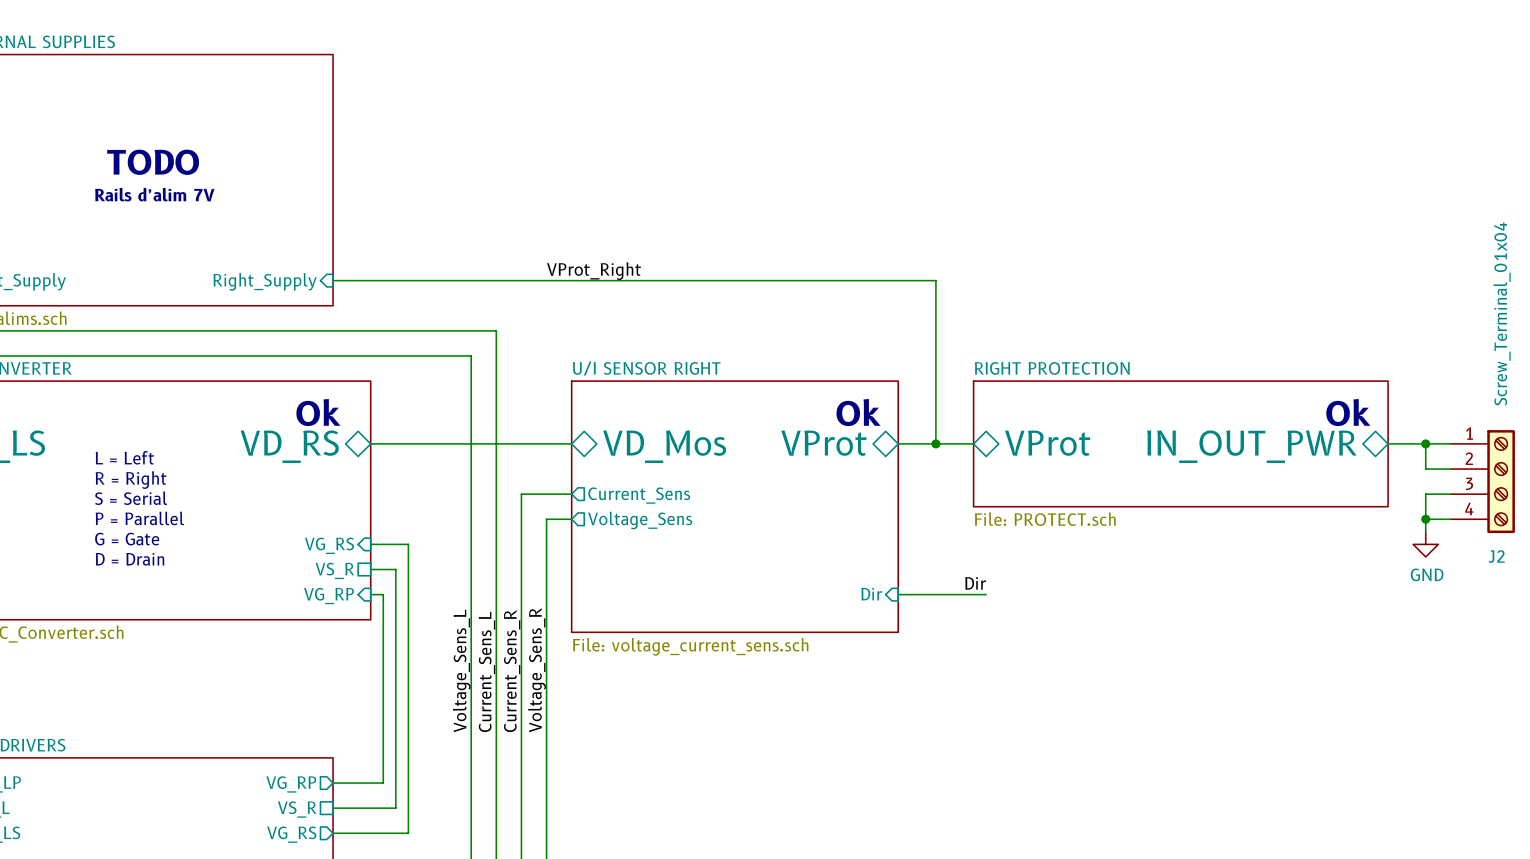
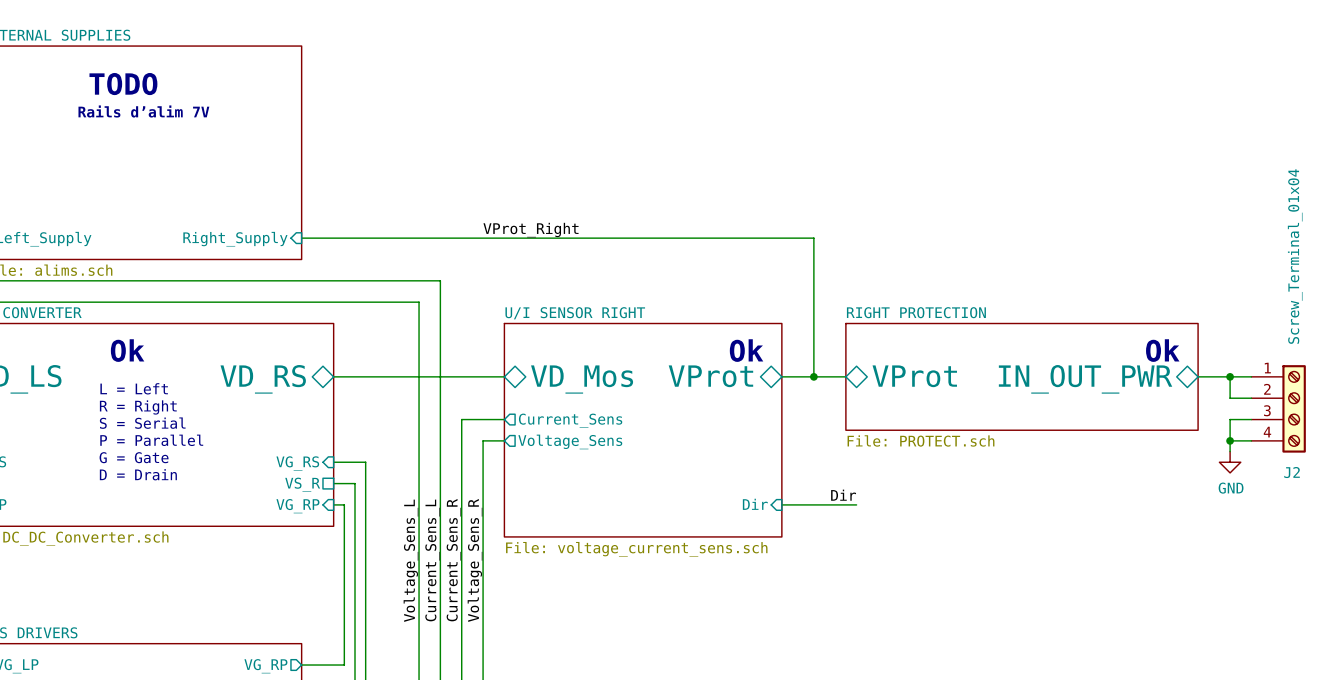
text position: TODO (153, 162) -> TODO (123, 84)
text position: Rails d’alim 7V (154, 194) -> Rails d’alim 7V (143, 111)
text position: Ok (318, 412) -> Ok (127, 350)

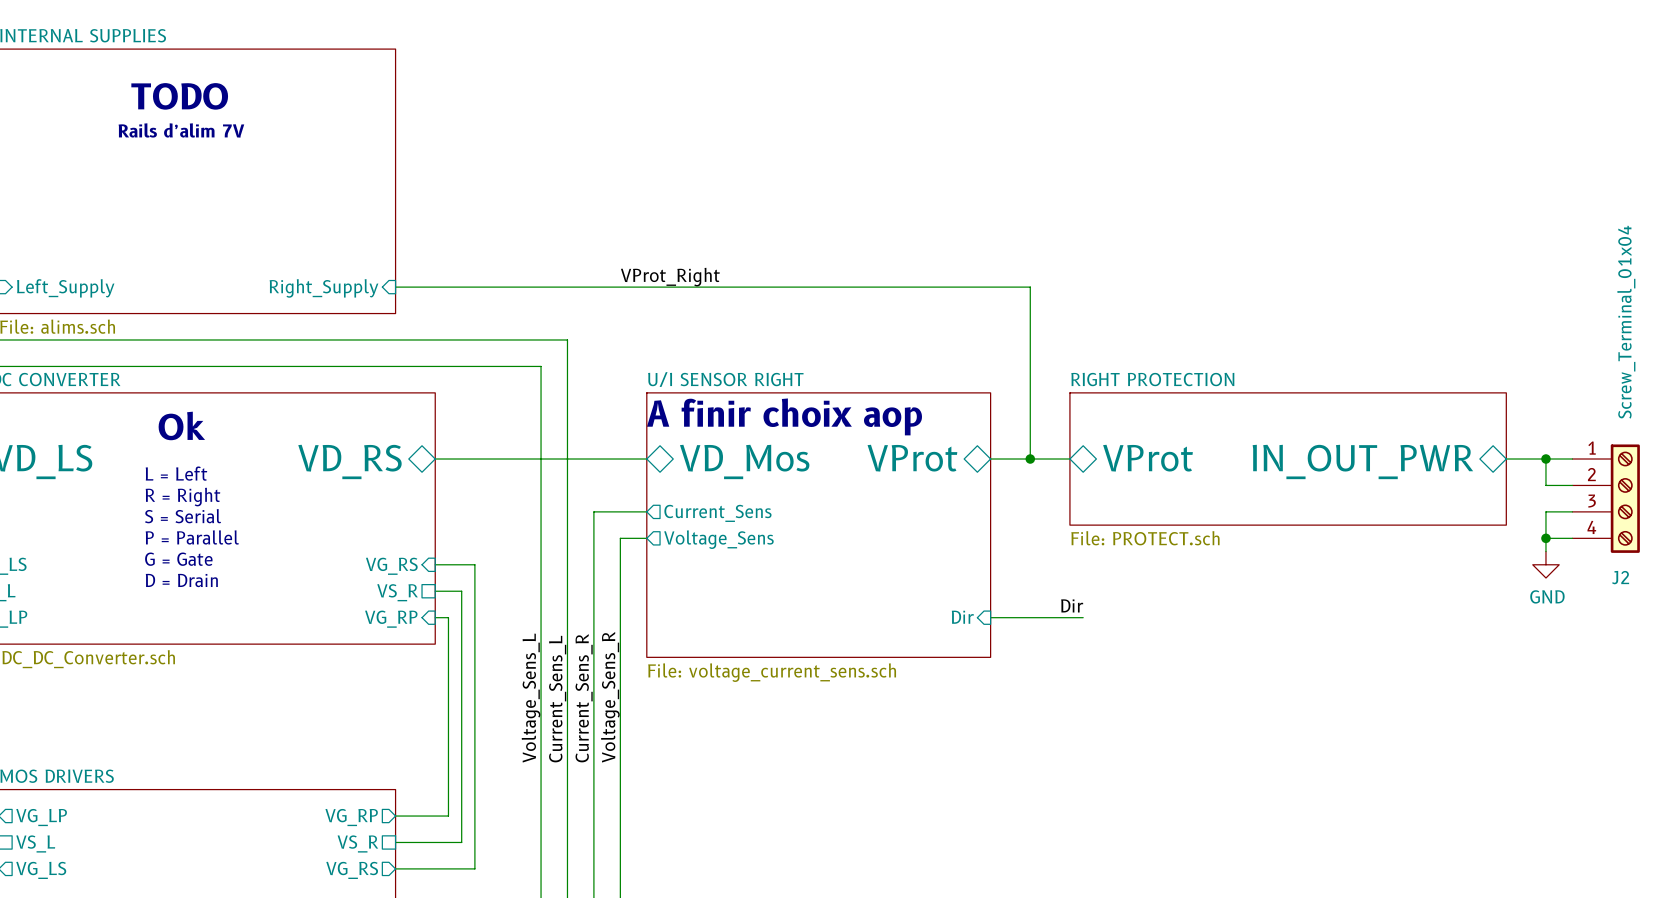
text: none -> A finir choix aop (784, 416)
text: Ok (746, 350) -> none
text: Ok (1162, 350) -> none

